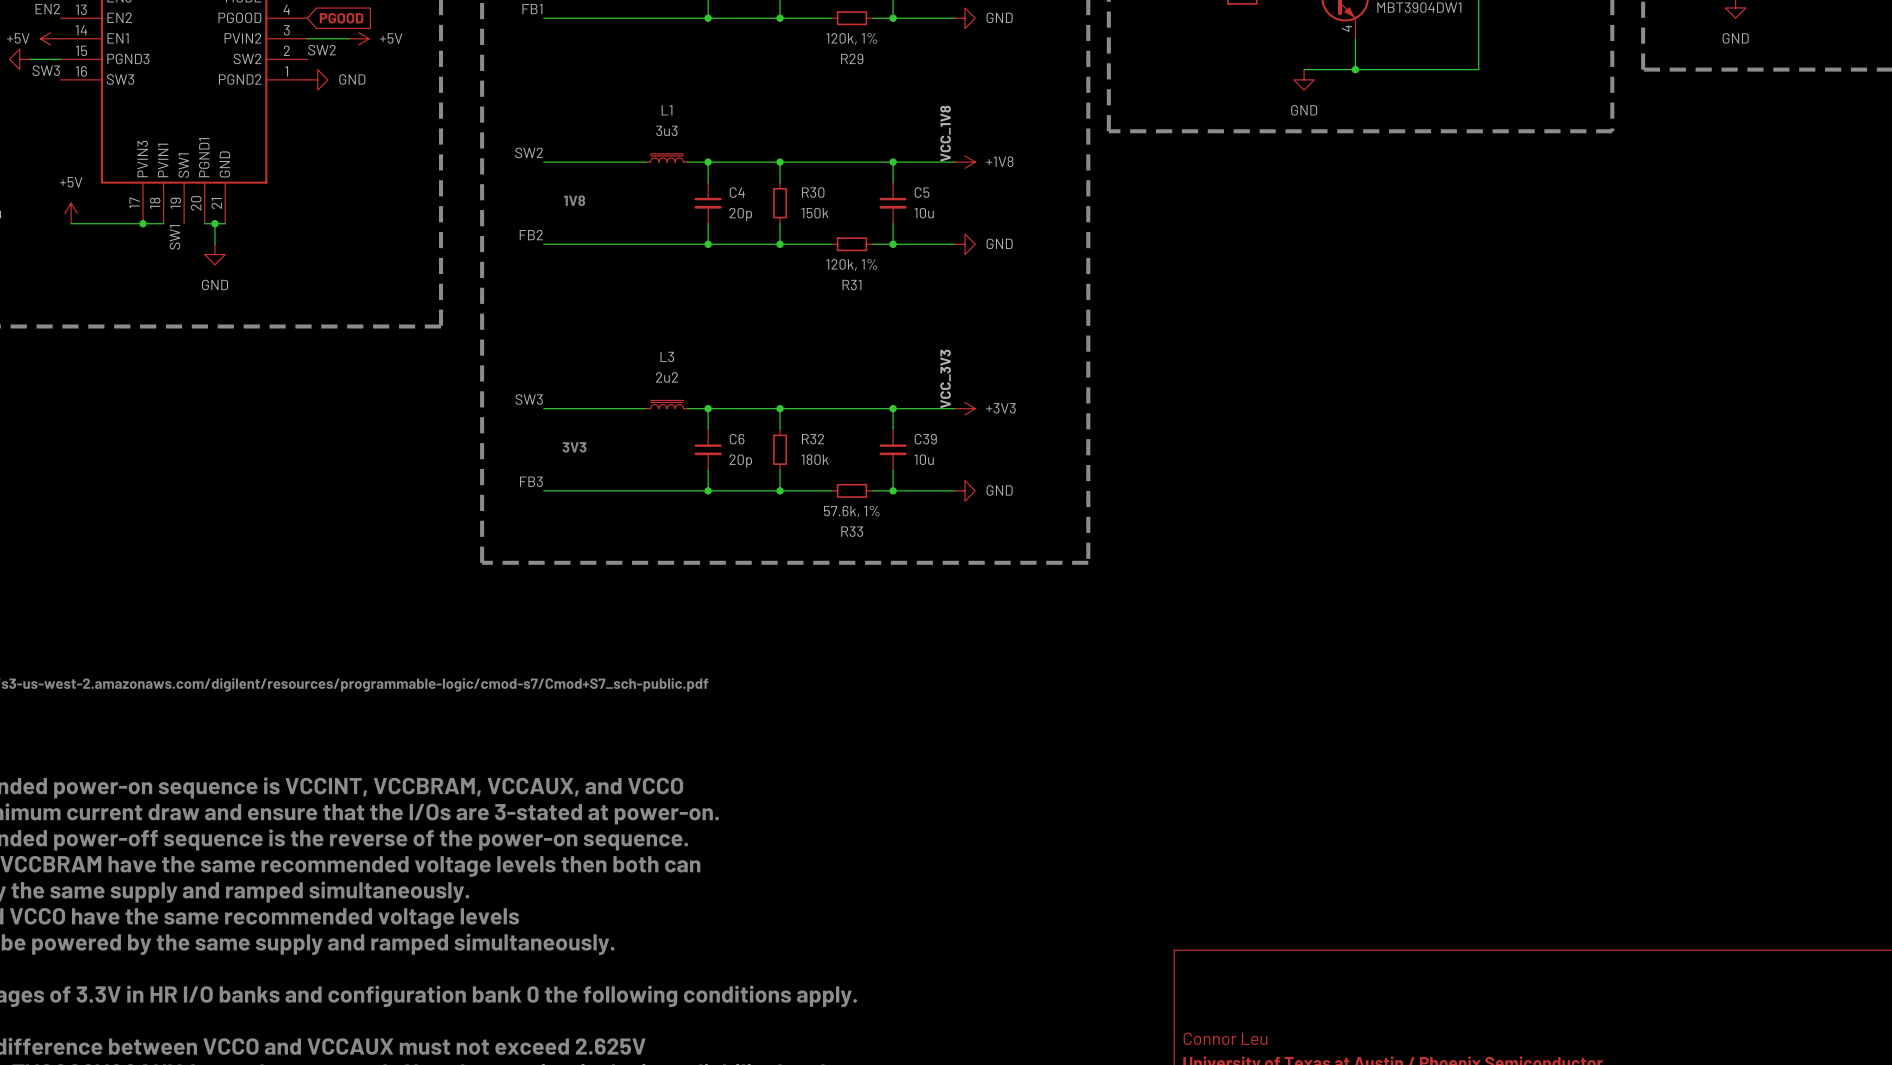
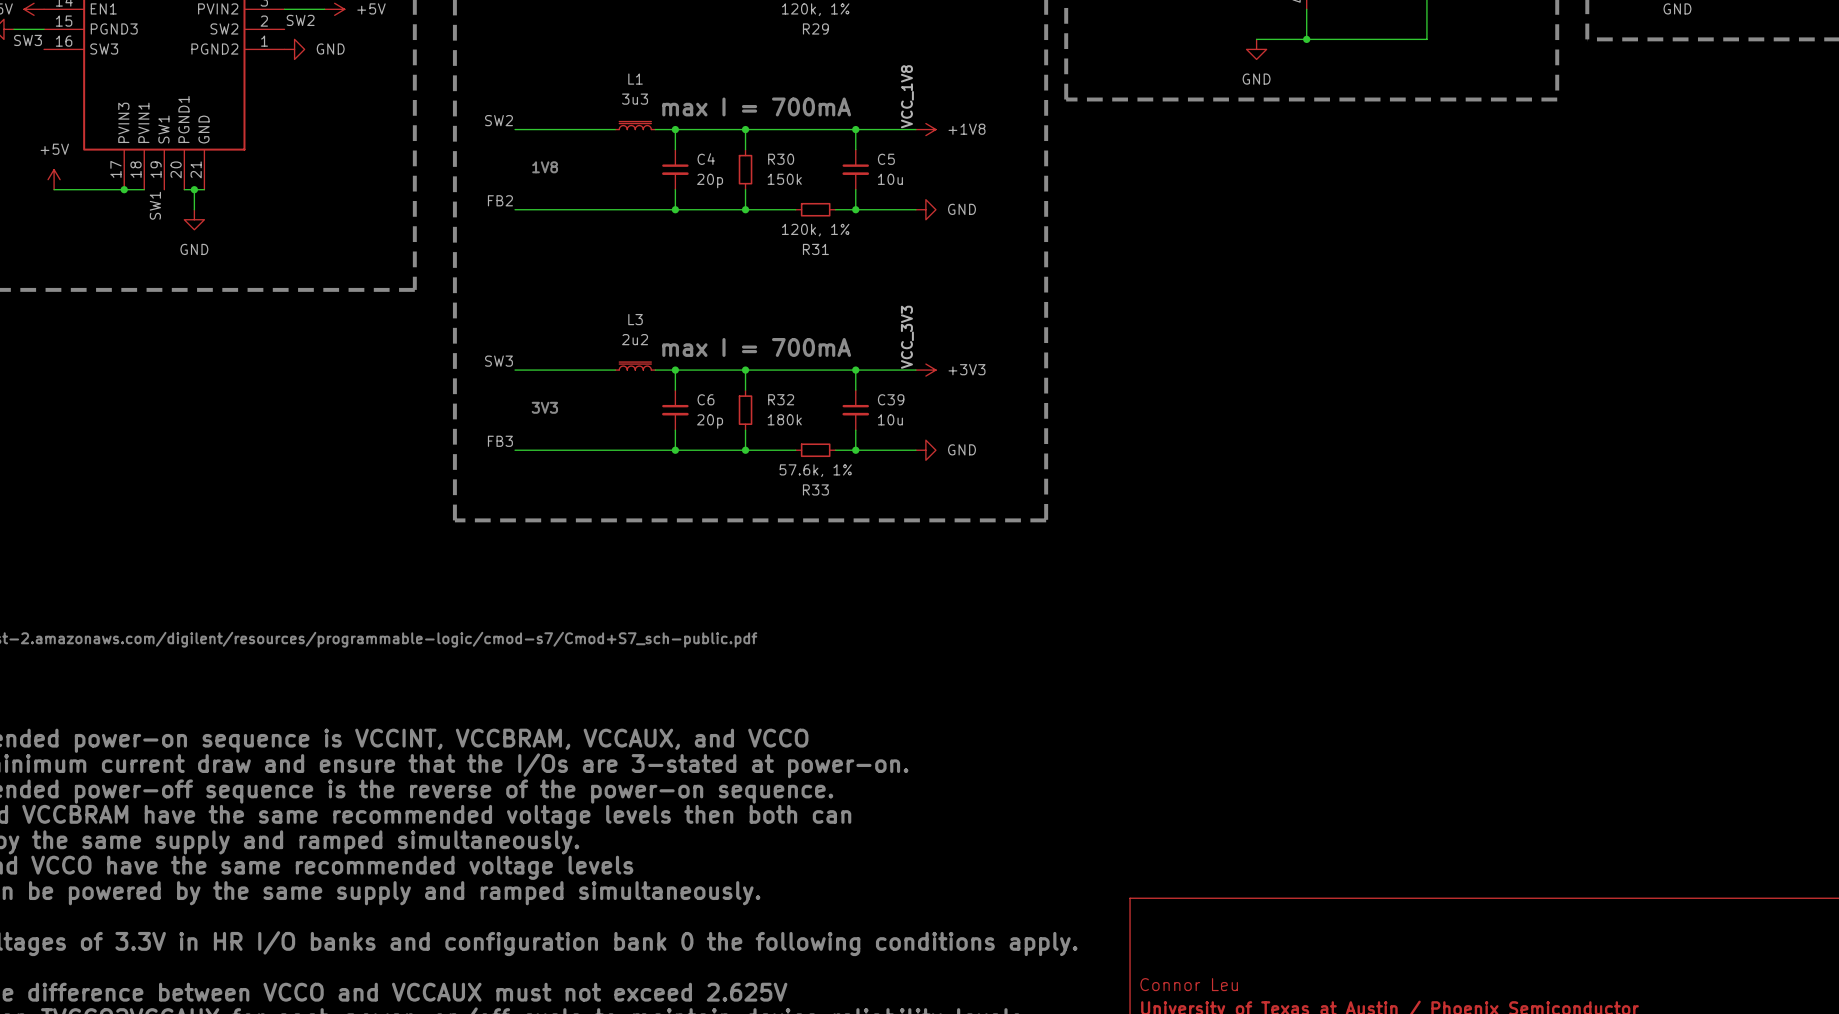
text: none -> max I = 700mA (756, 106)
text: none -> max I = 700mA (756, 347)

